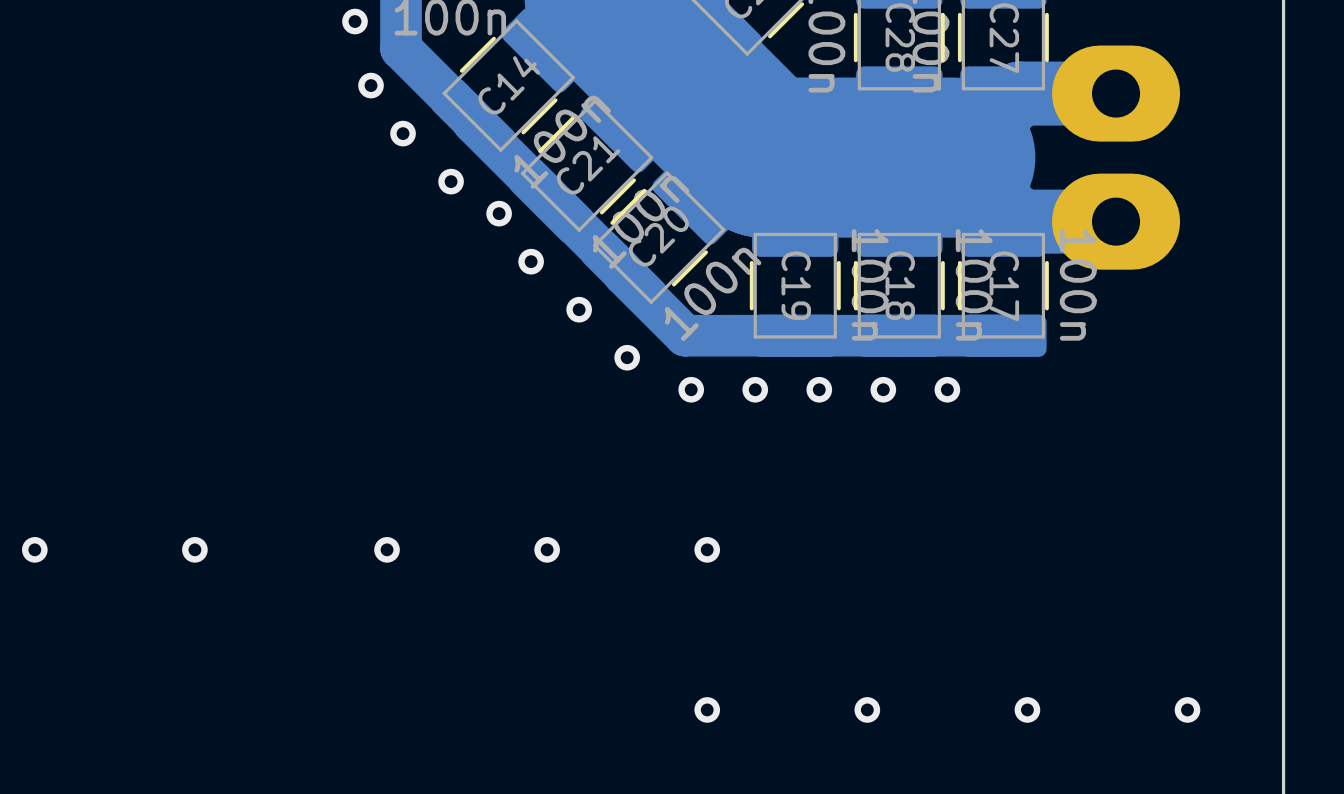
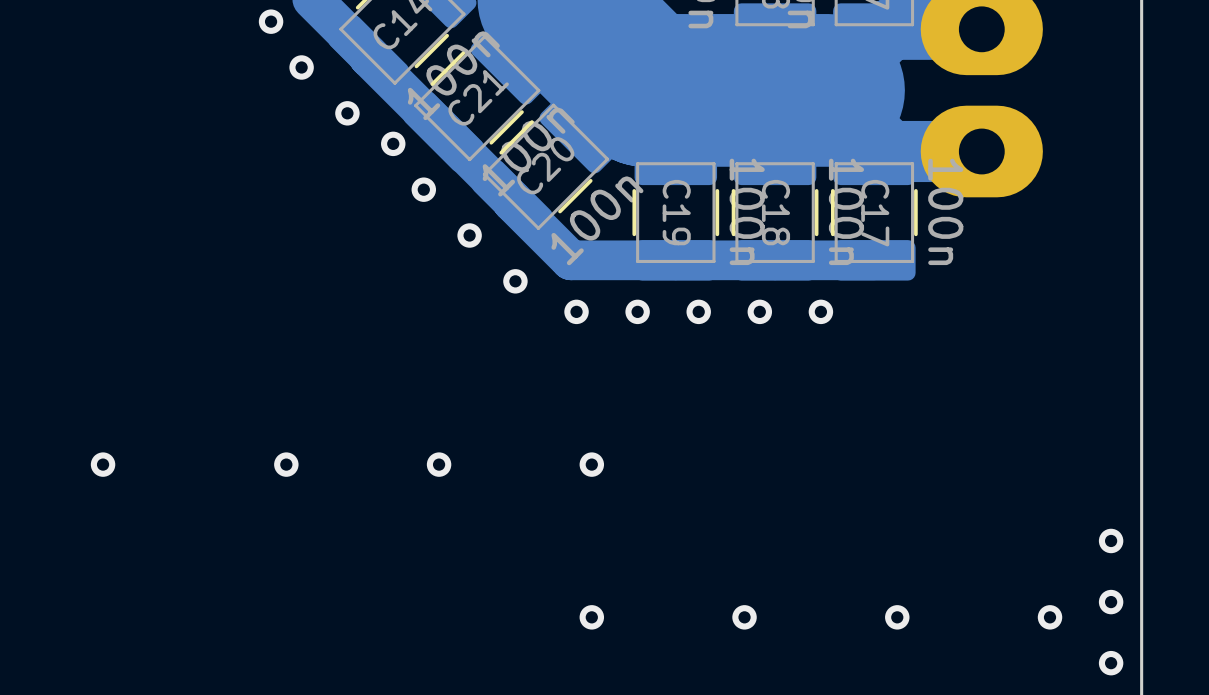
via: none -> (1111, 540)
via: none -> (1111, 602)
via: none -> (1111, 663)

